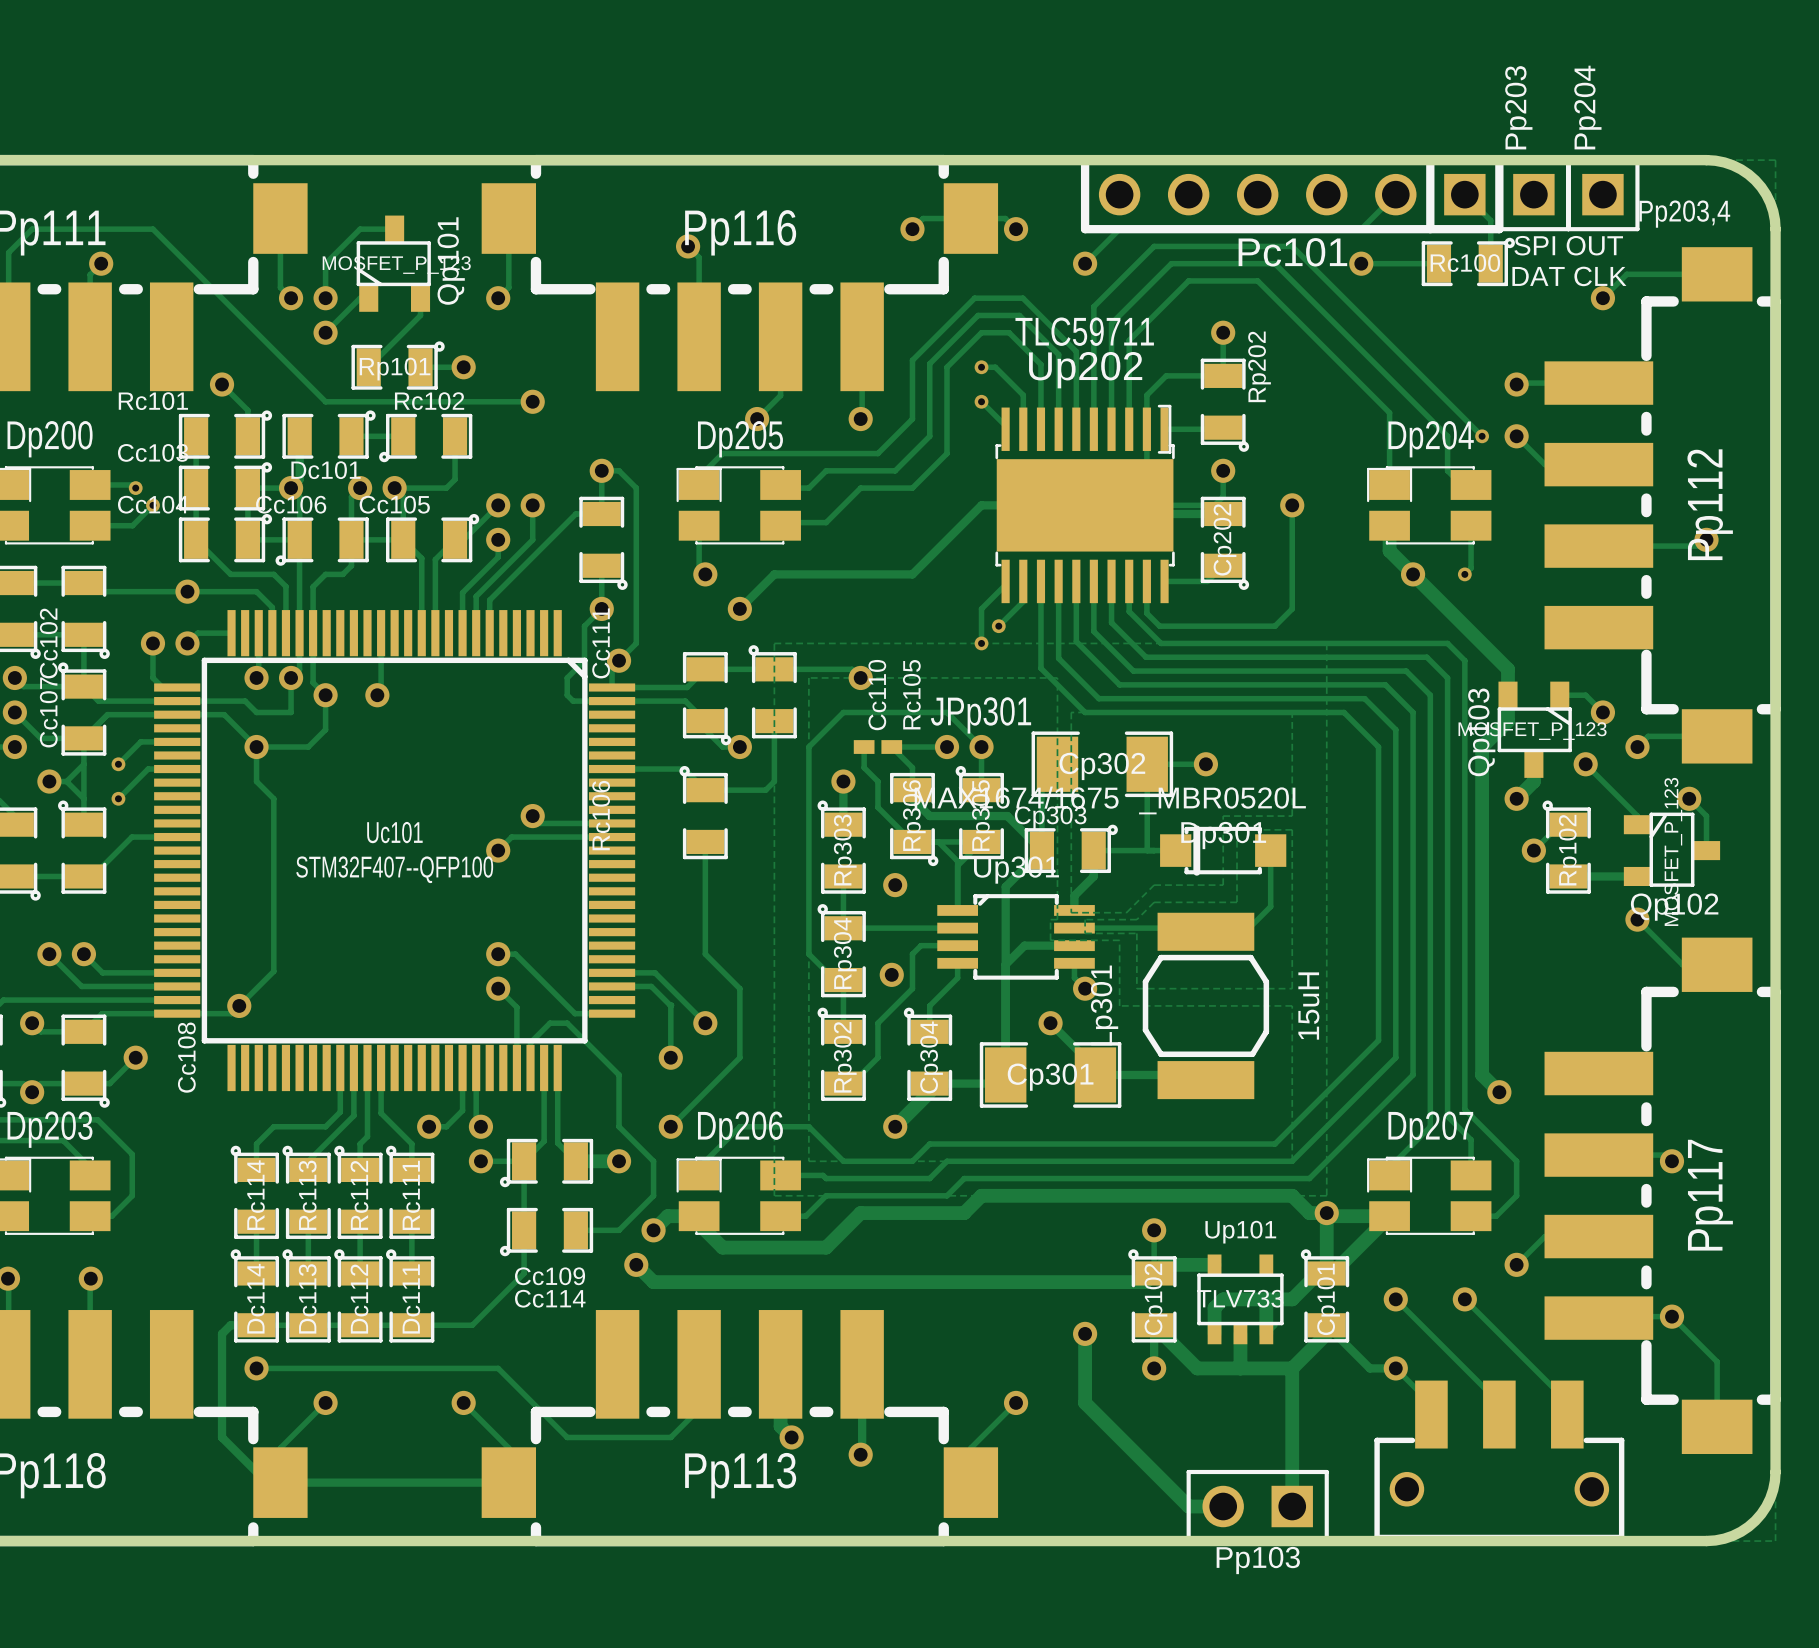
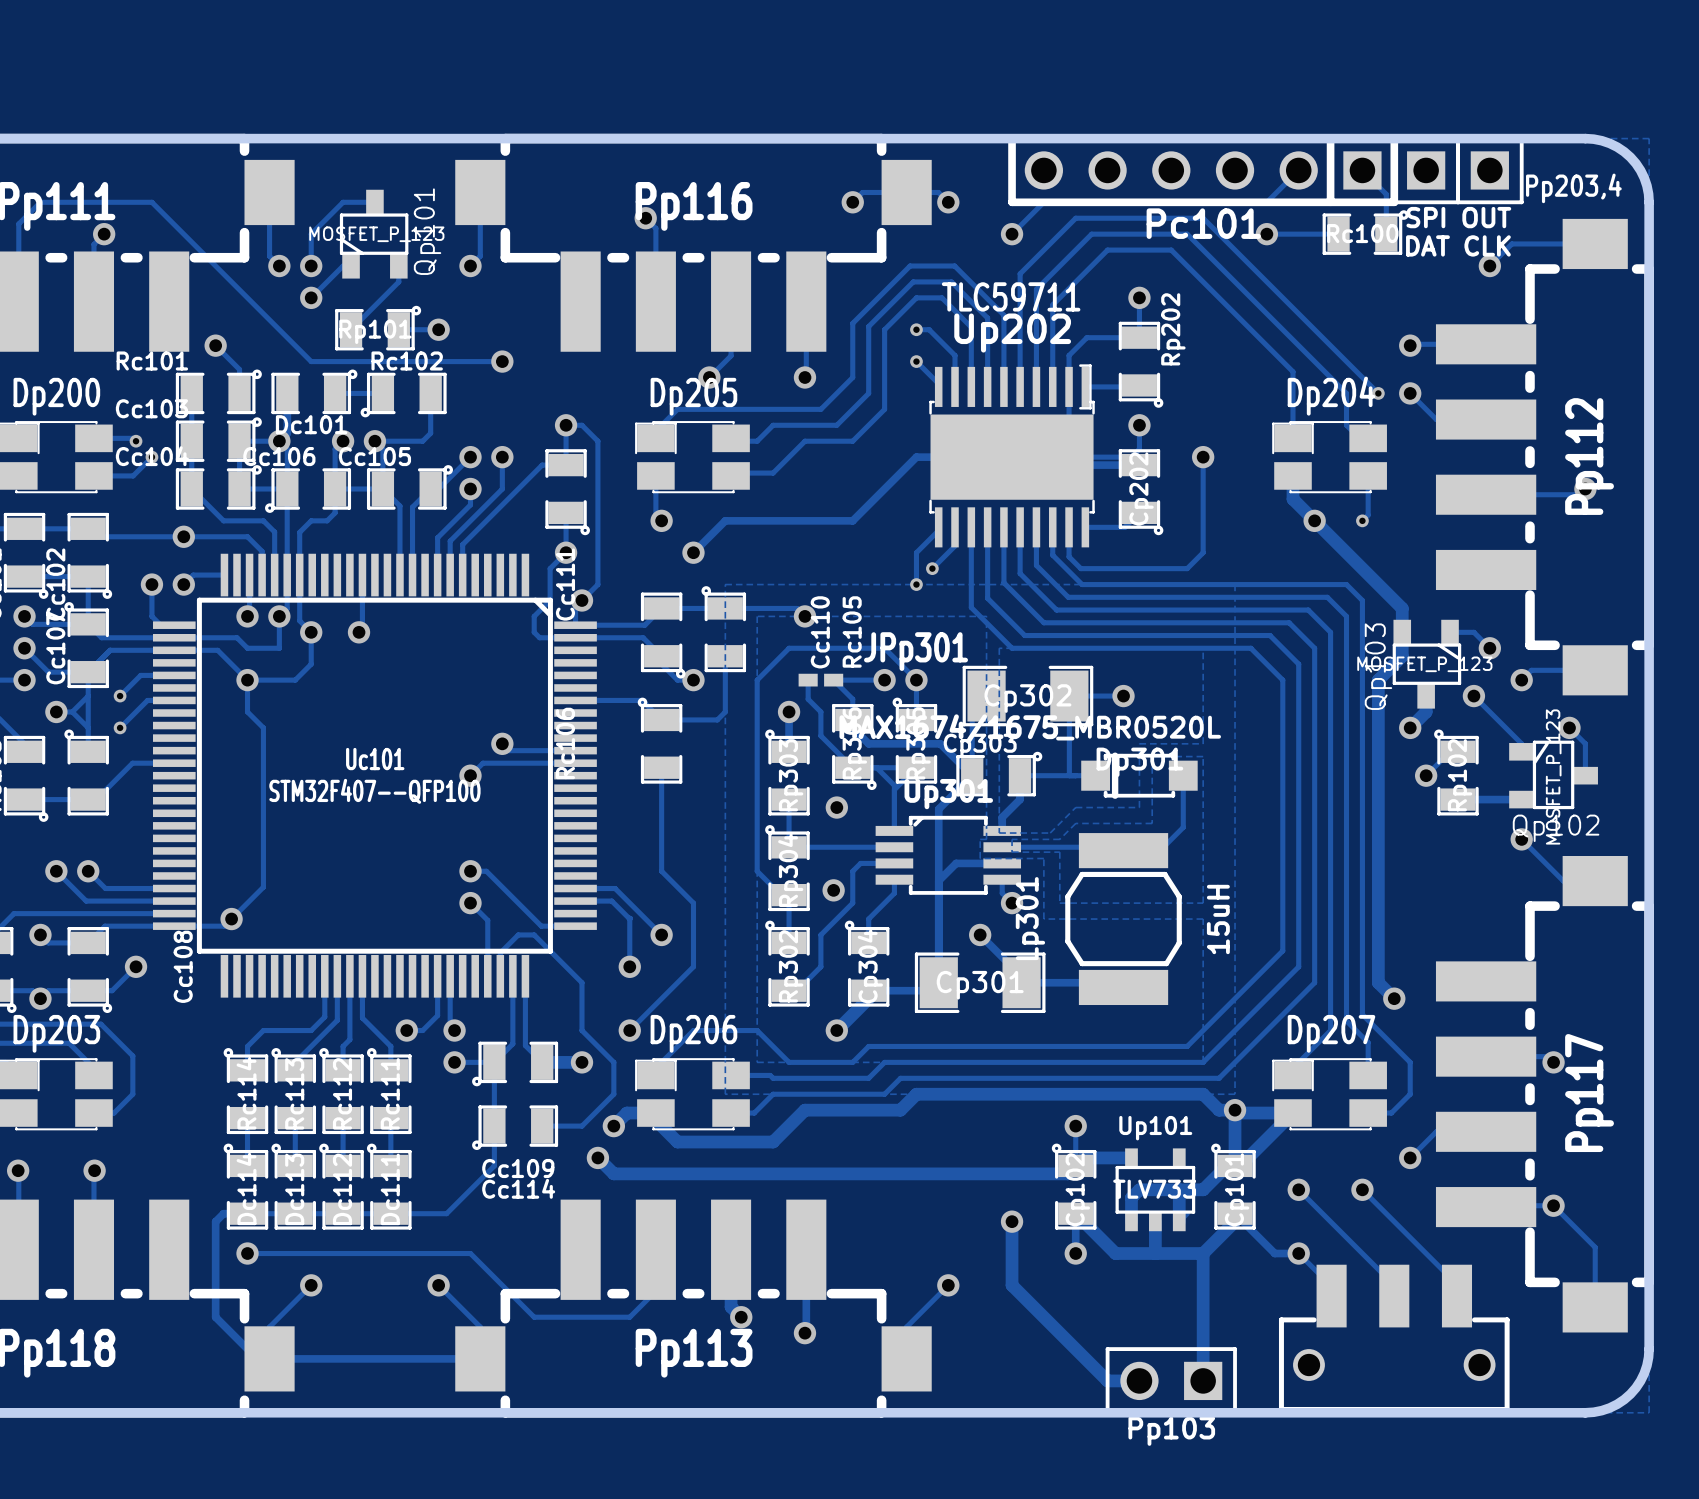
Pp203 name: Pp203 (1518, 107) -> none
Pp204 name: Pp204 (1587, 107) -> none

